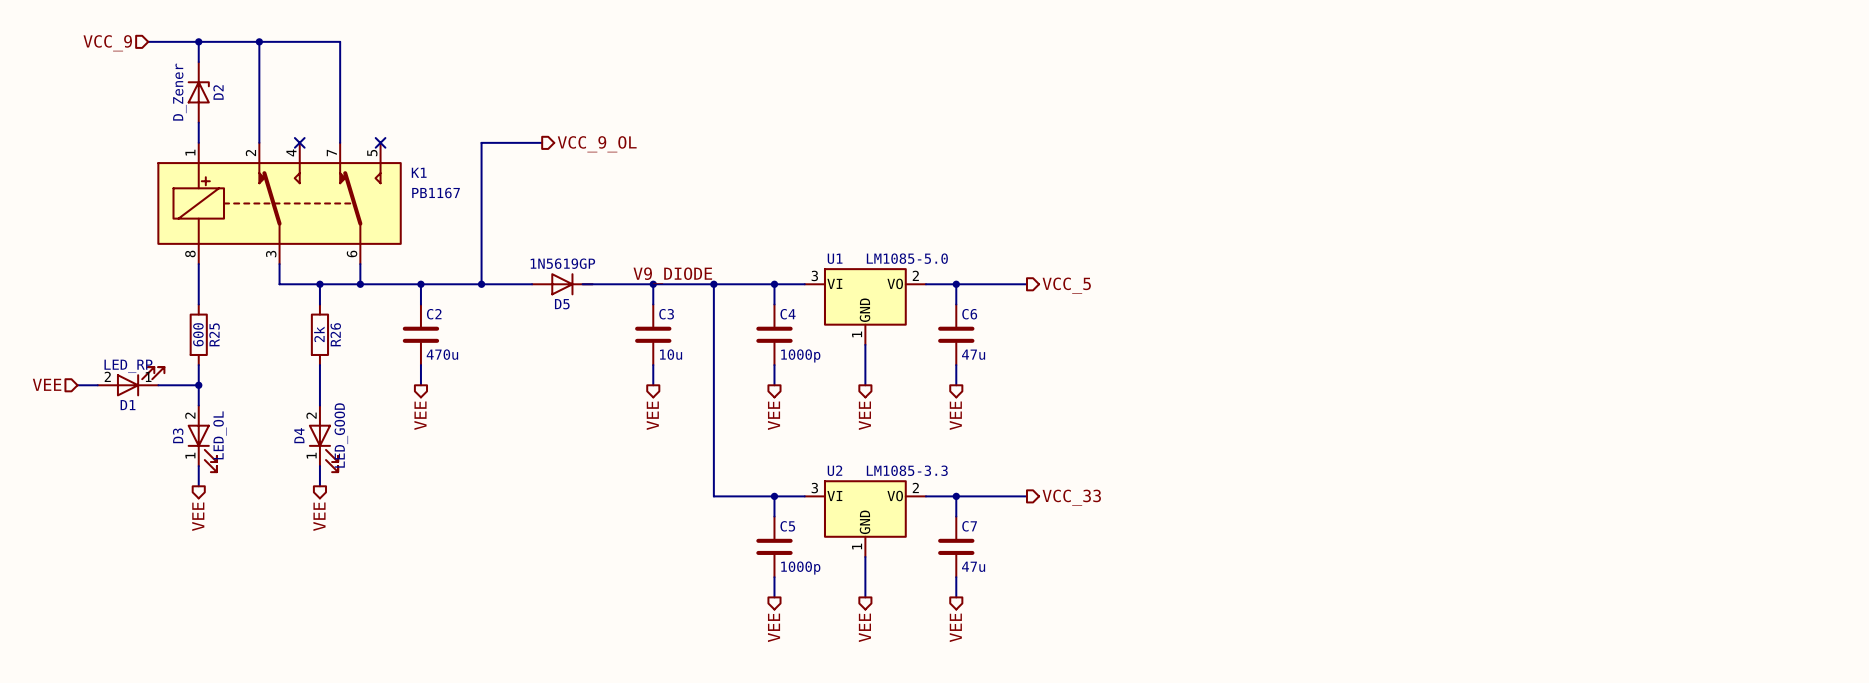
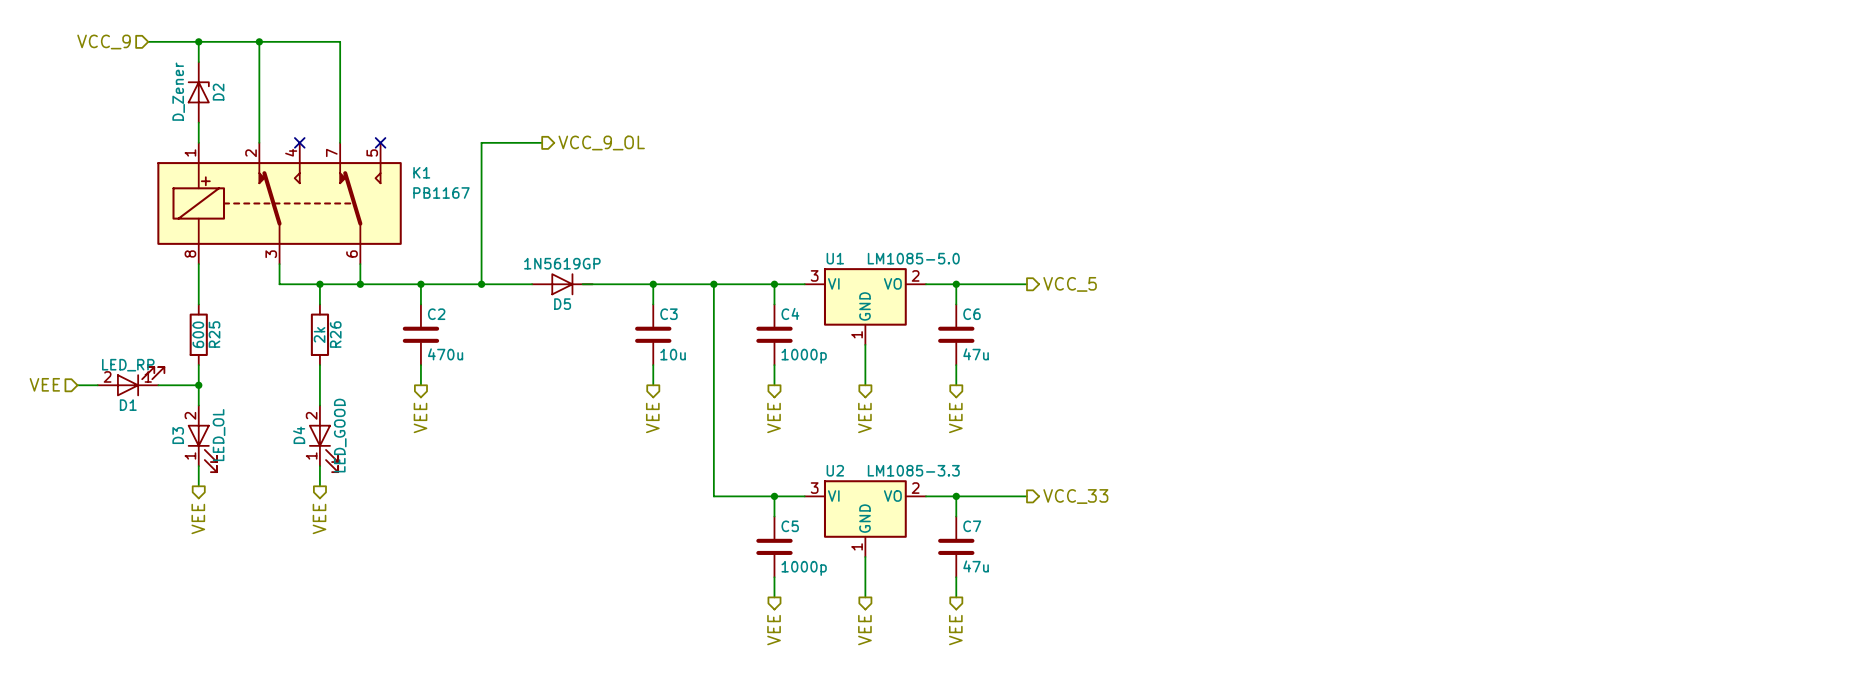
label: V9_DIODE (672, 275) -> none

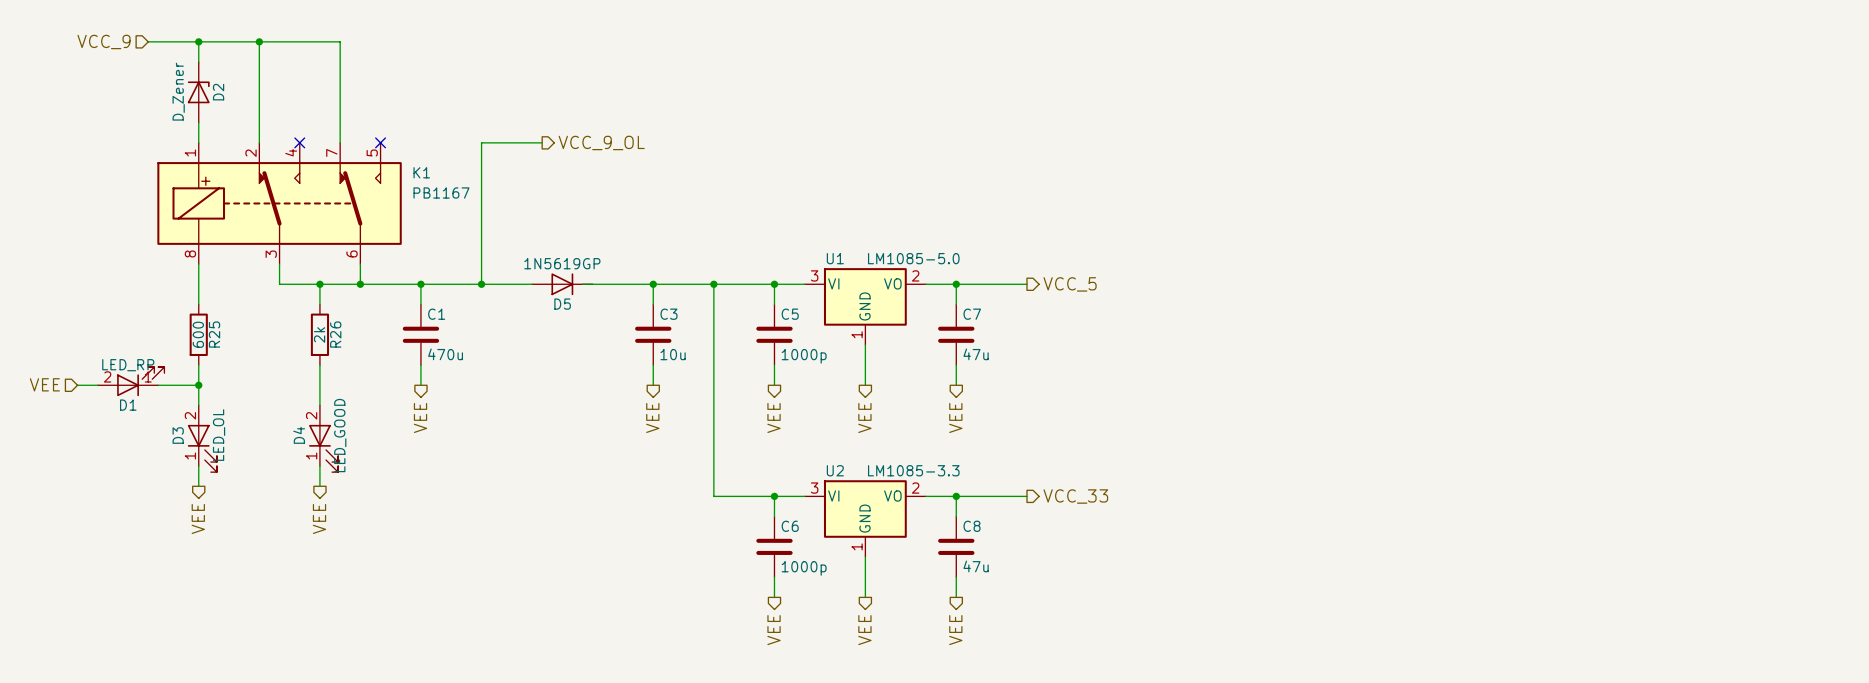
C4 name: C4 (790, 313) -> C5 (790, 314)
C2 name: C2 (436, 314) -> C1 (436, 314)
C6 name: C6 (971, 314) -> C7 (972, 314)
C5 name: C5 (790, 526) -> C6 (790, 526)
C7 name: C7 (972, 526) -> C8 (971, 526)

